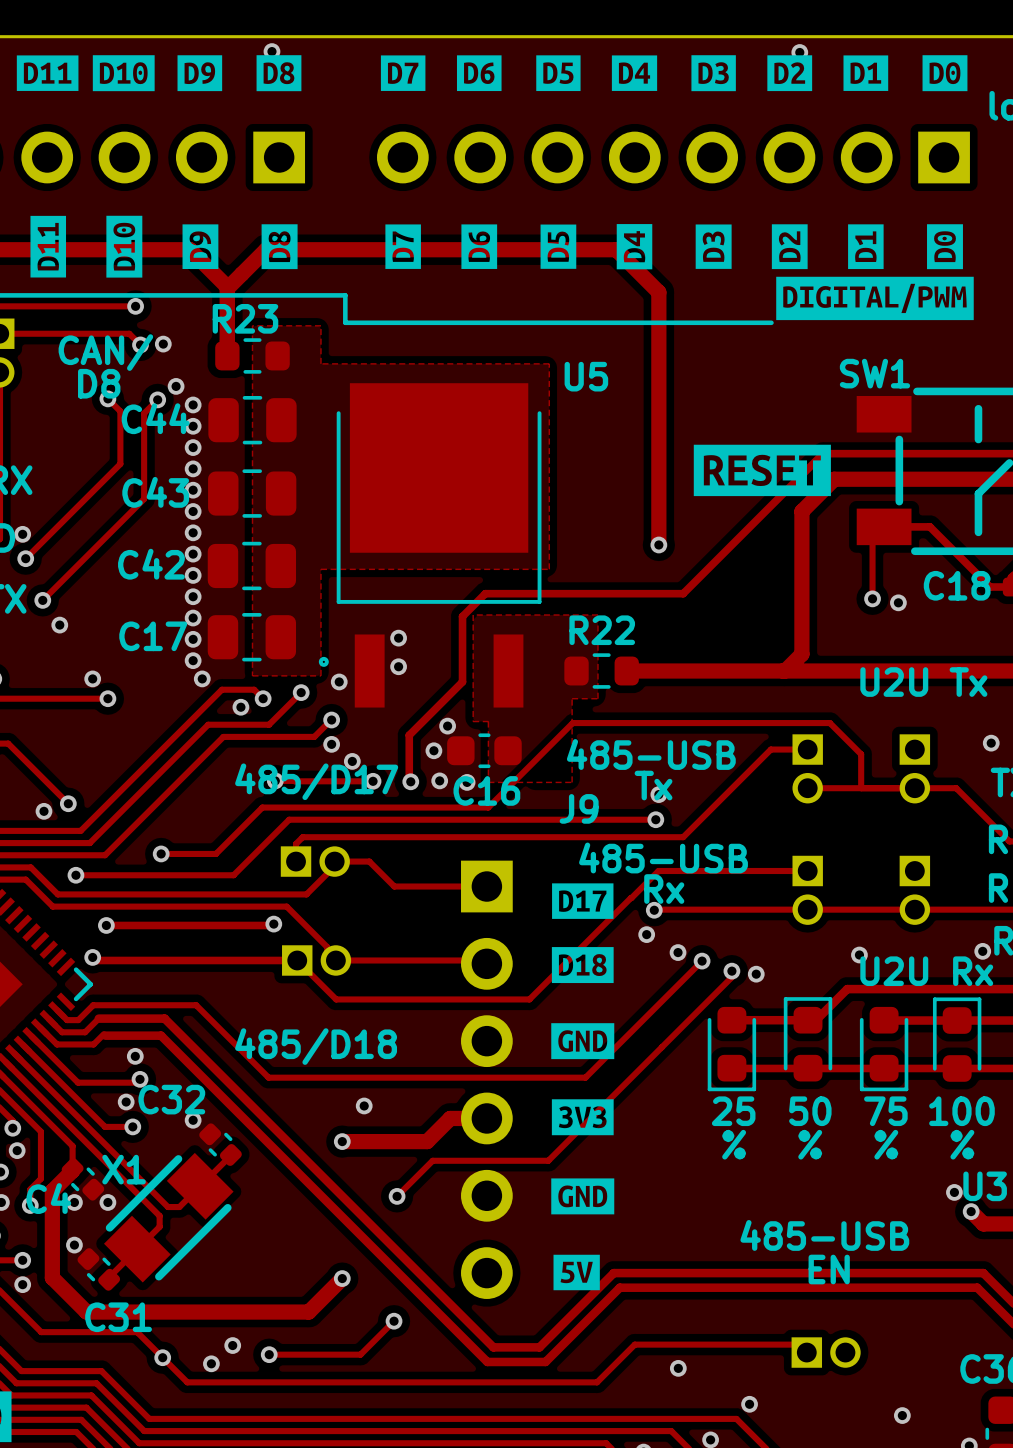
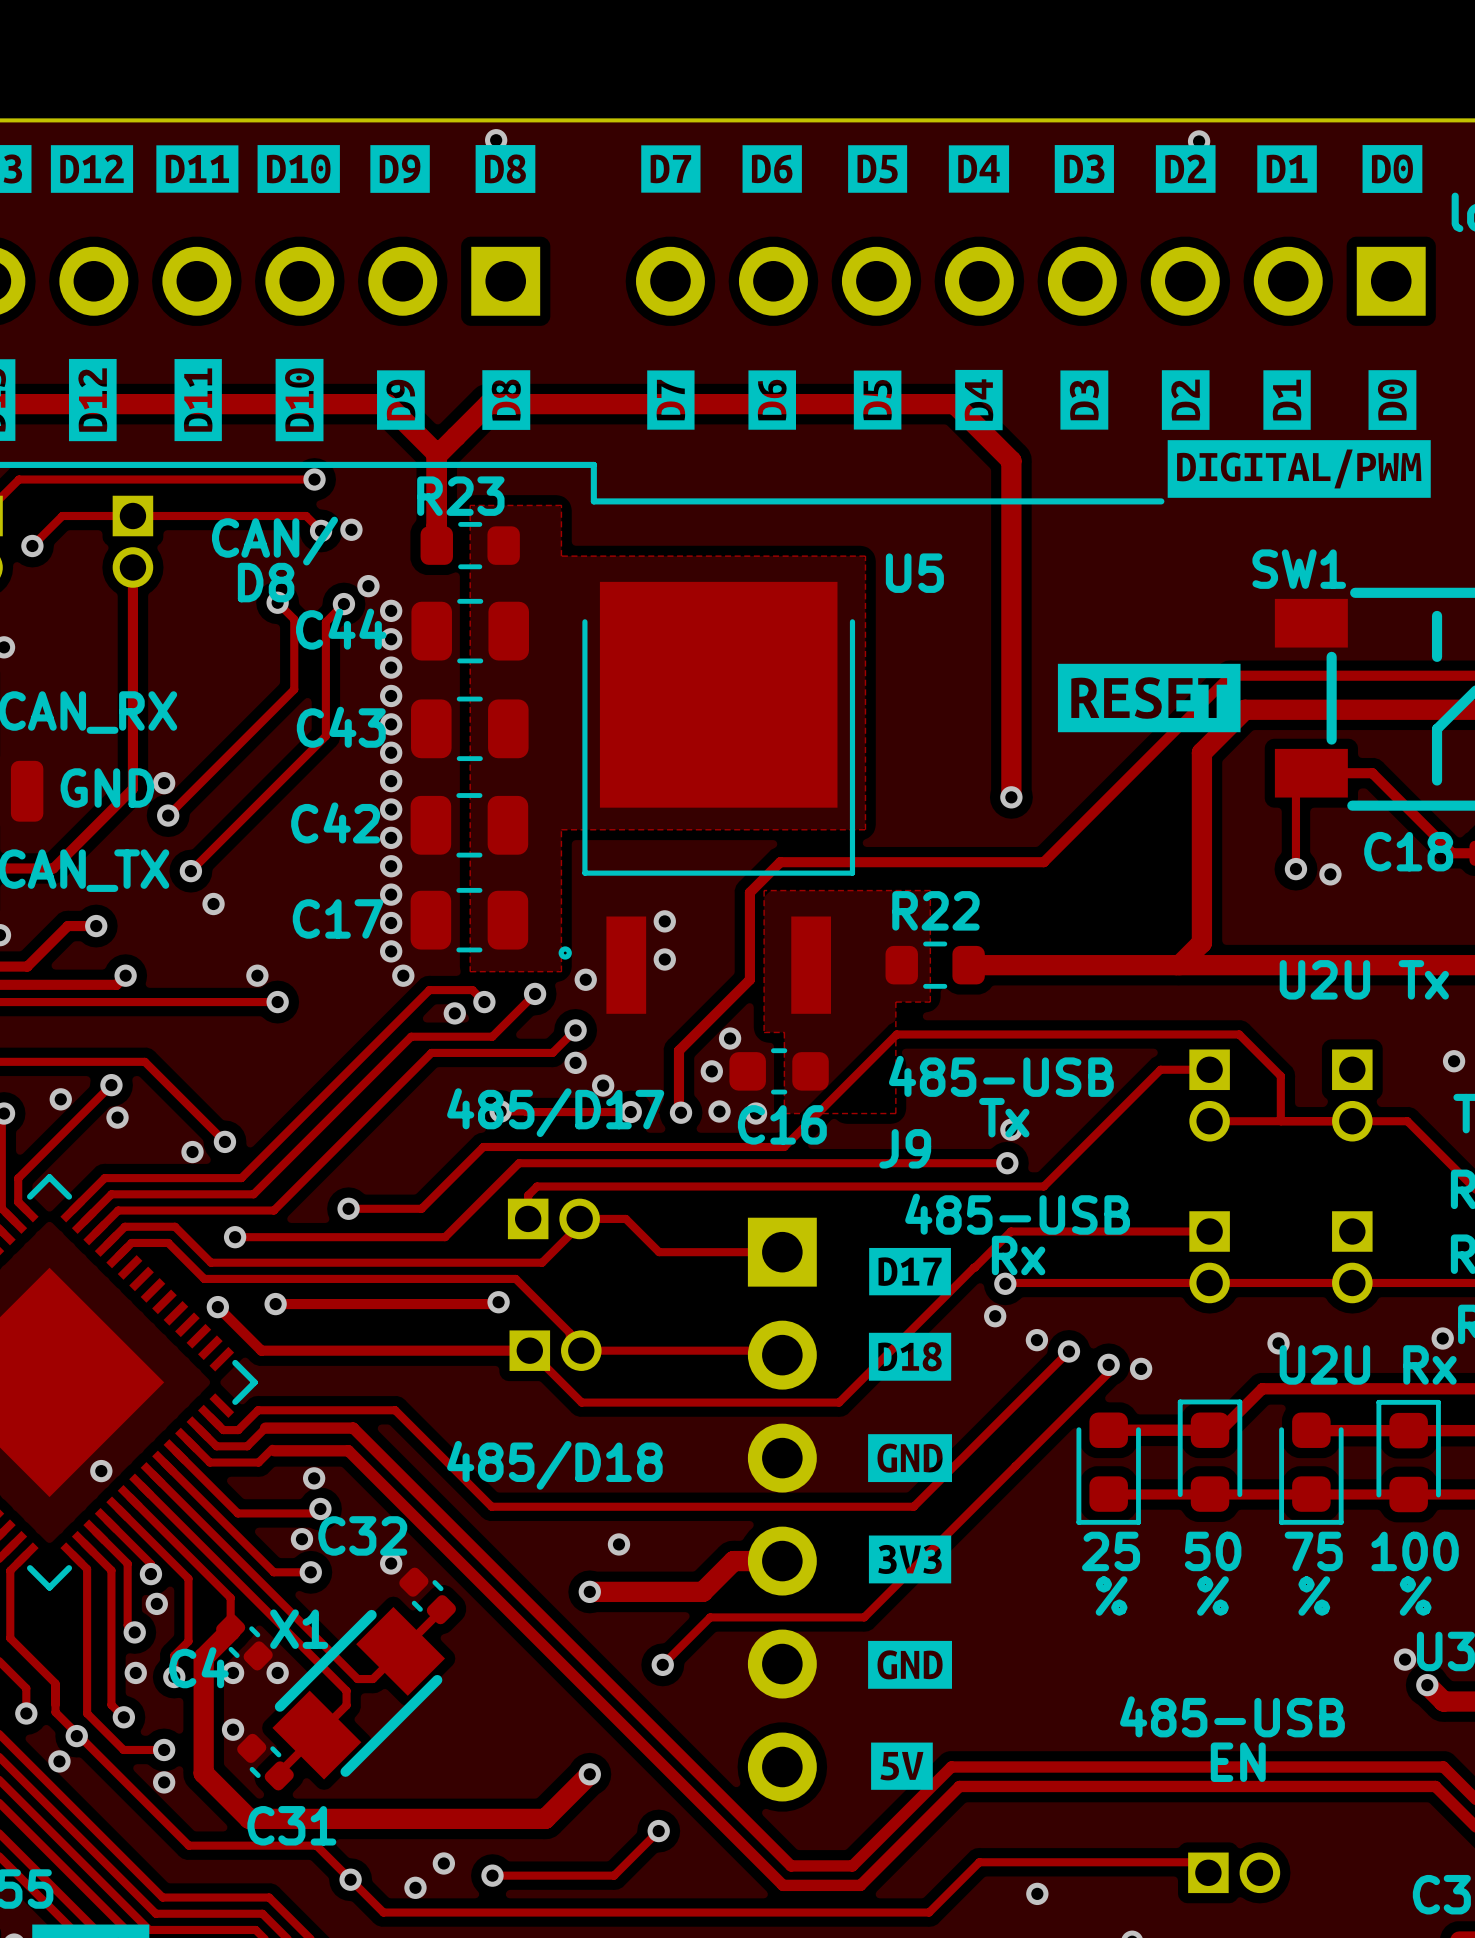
track: none -> (217, 1307) (257, 1346)
via position: (92, 957) -> (217, 1307)

